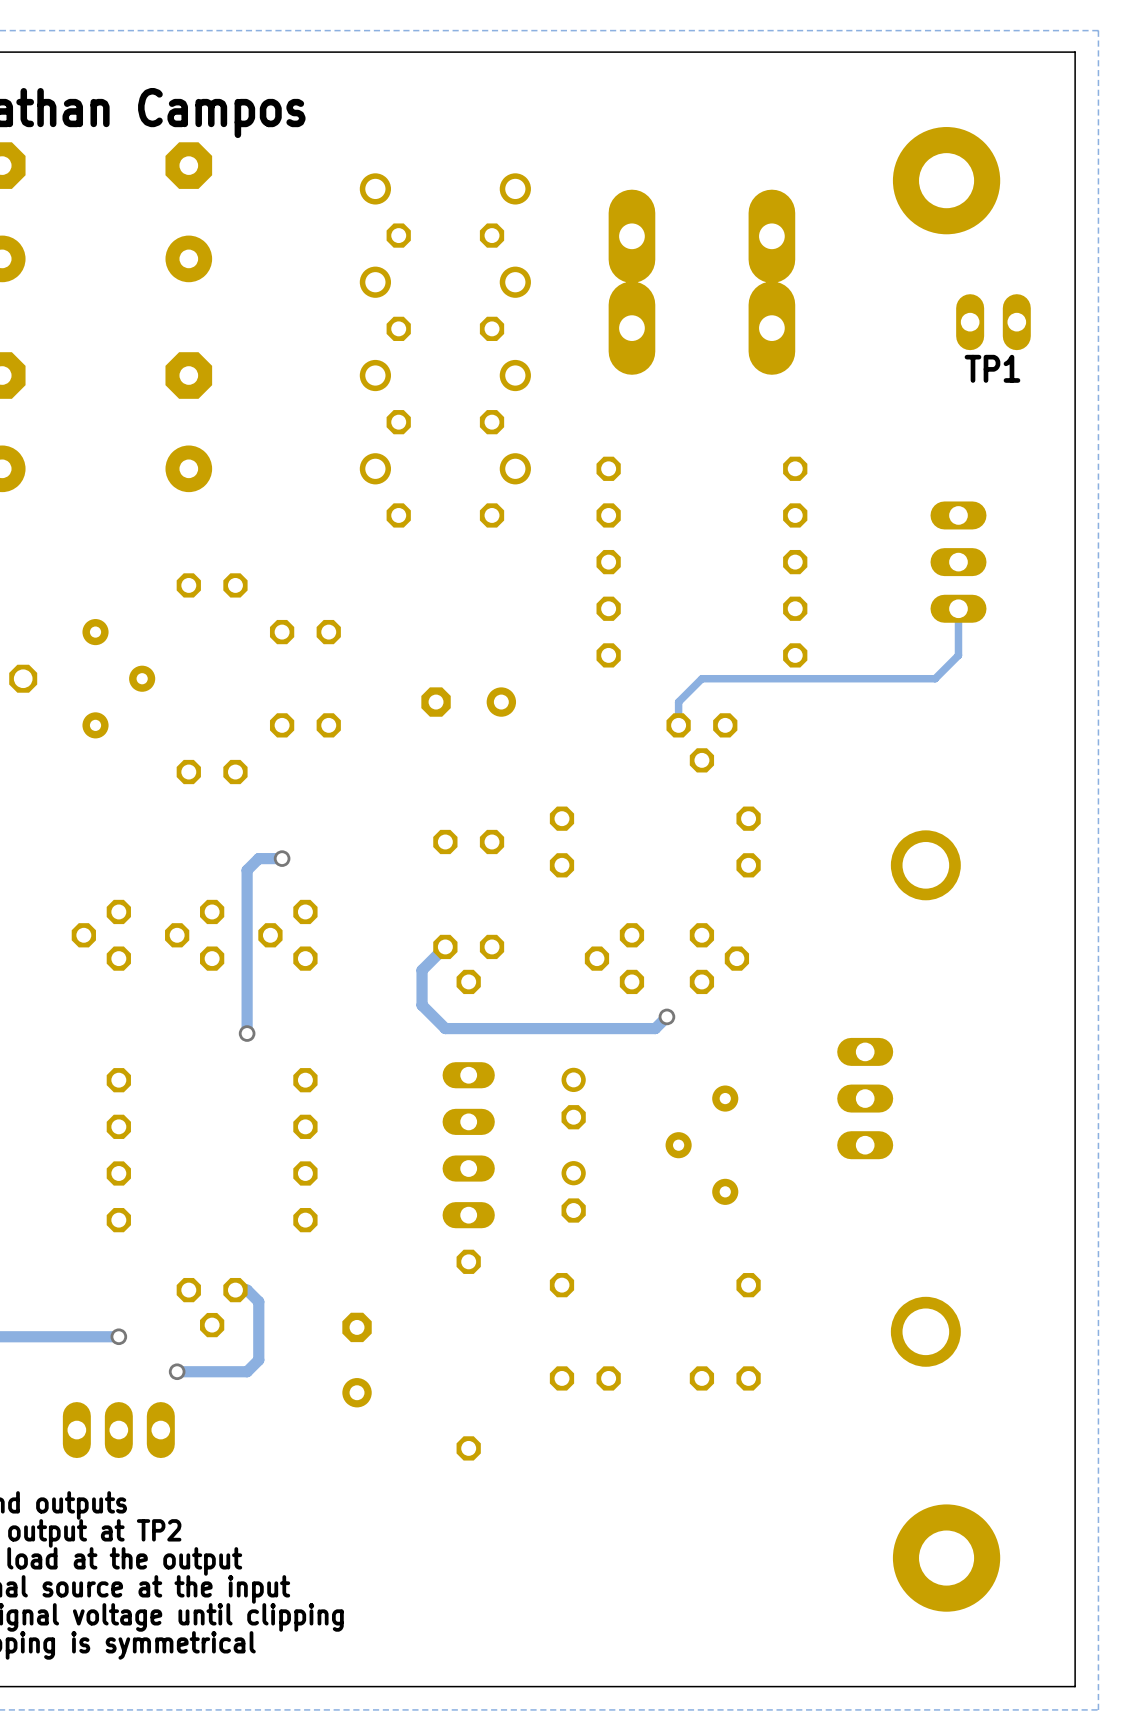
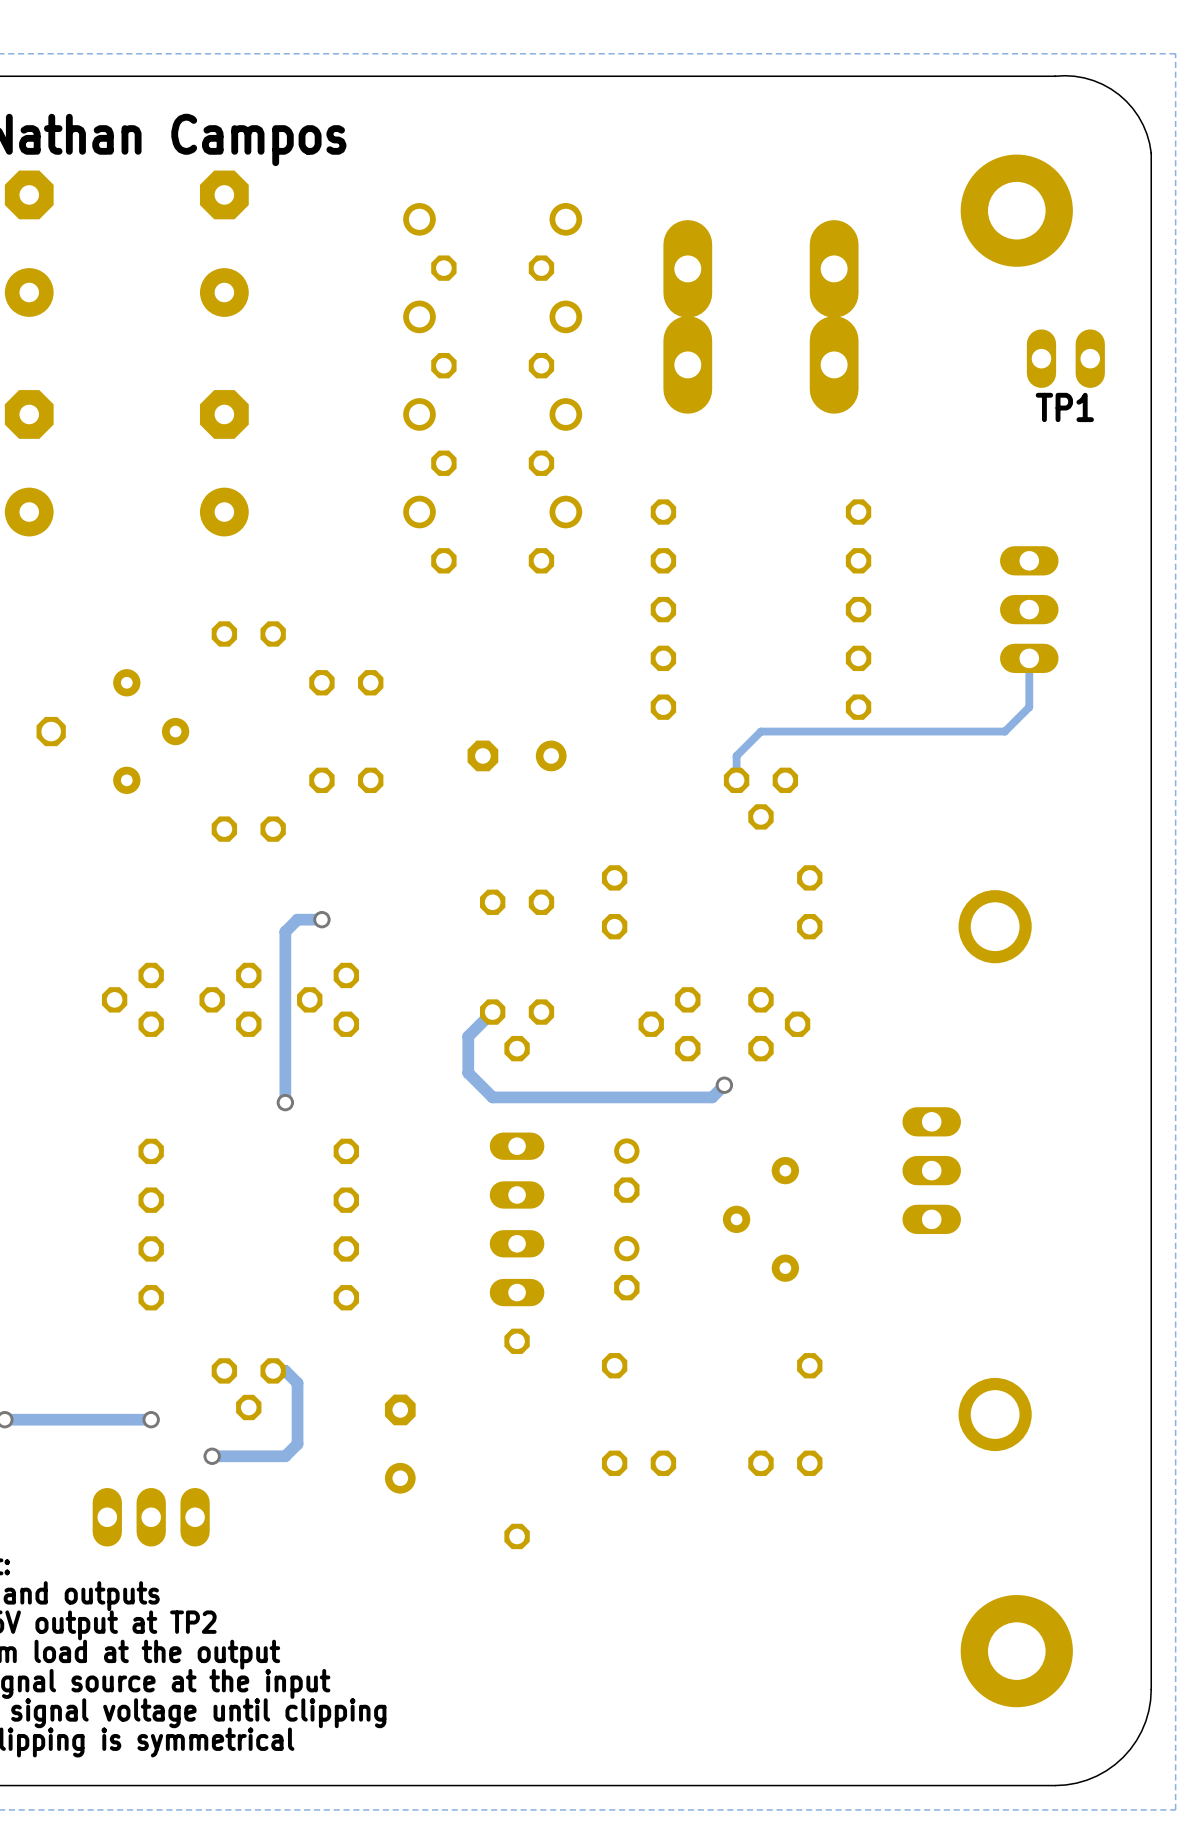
board edge: (983, 52) (1075, 52) (1075, 125) -> (1055, 76) (1074, 76) (1093, 80) (1119, 94) (1138, 116) (1146, 134) (1151, 153)
board edge: (1075, 1594) (1075, 1686) (983, 1686) -> (1151, 1689) (1145, 1721) (1136, 1740) (1123, 1757) (1106, 1770) (1086, 1780) (1055, 1785)

